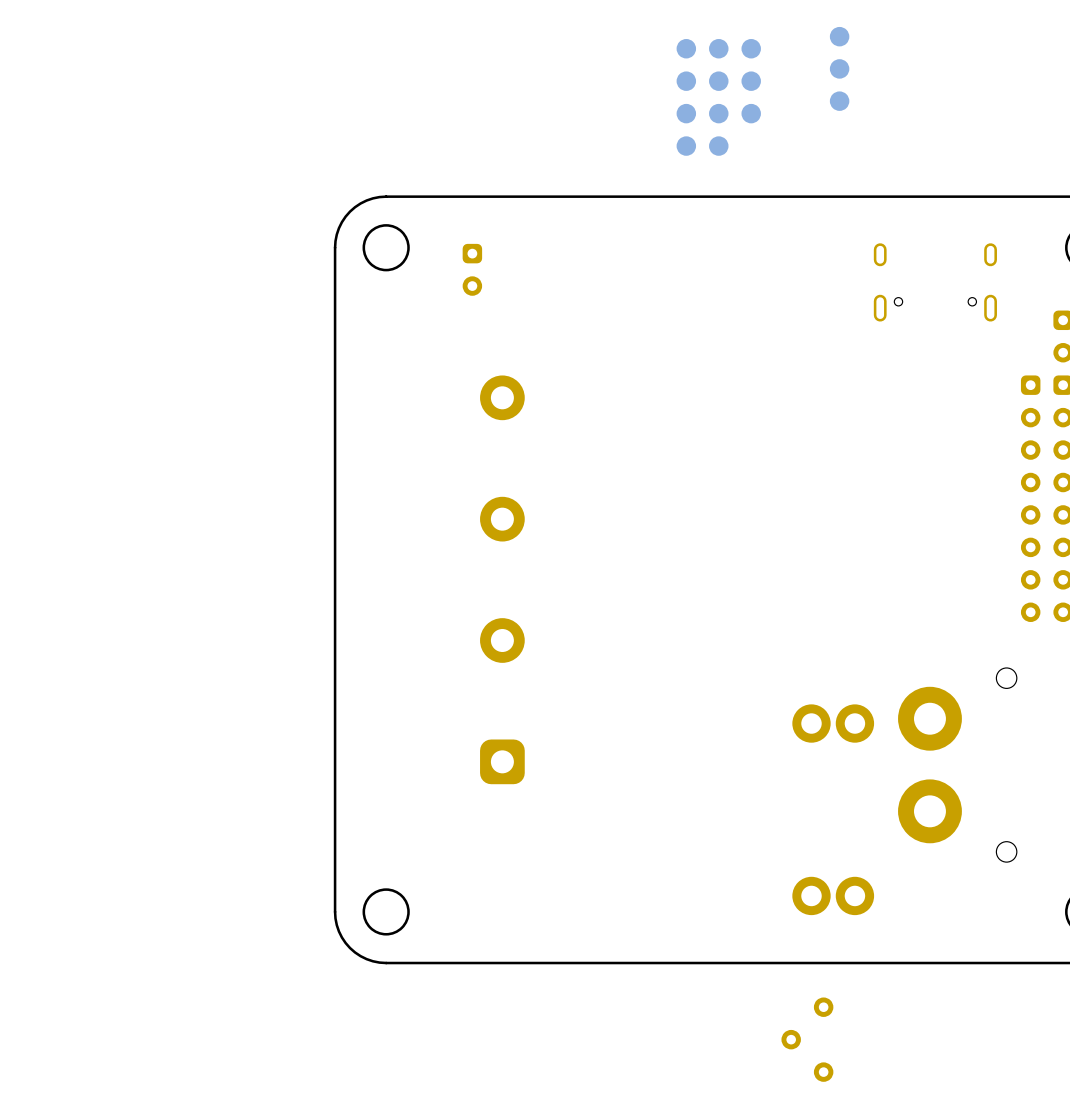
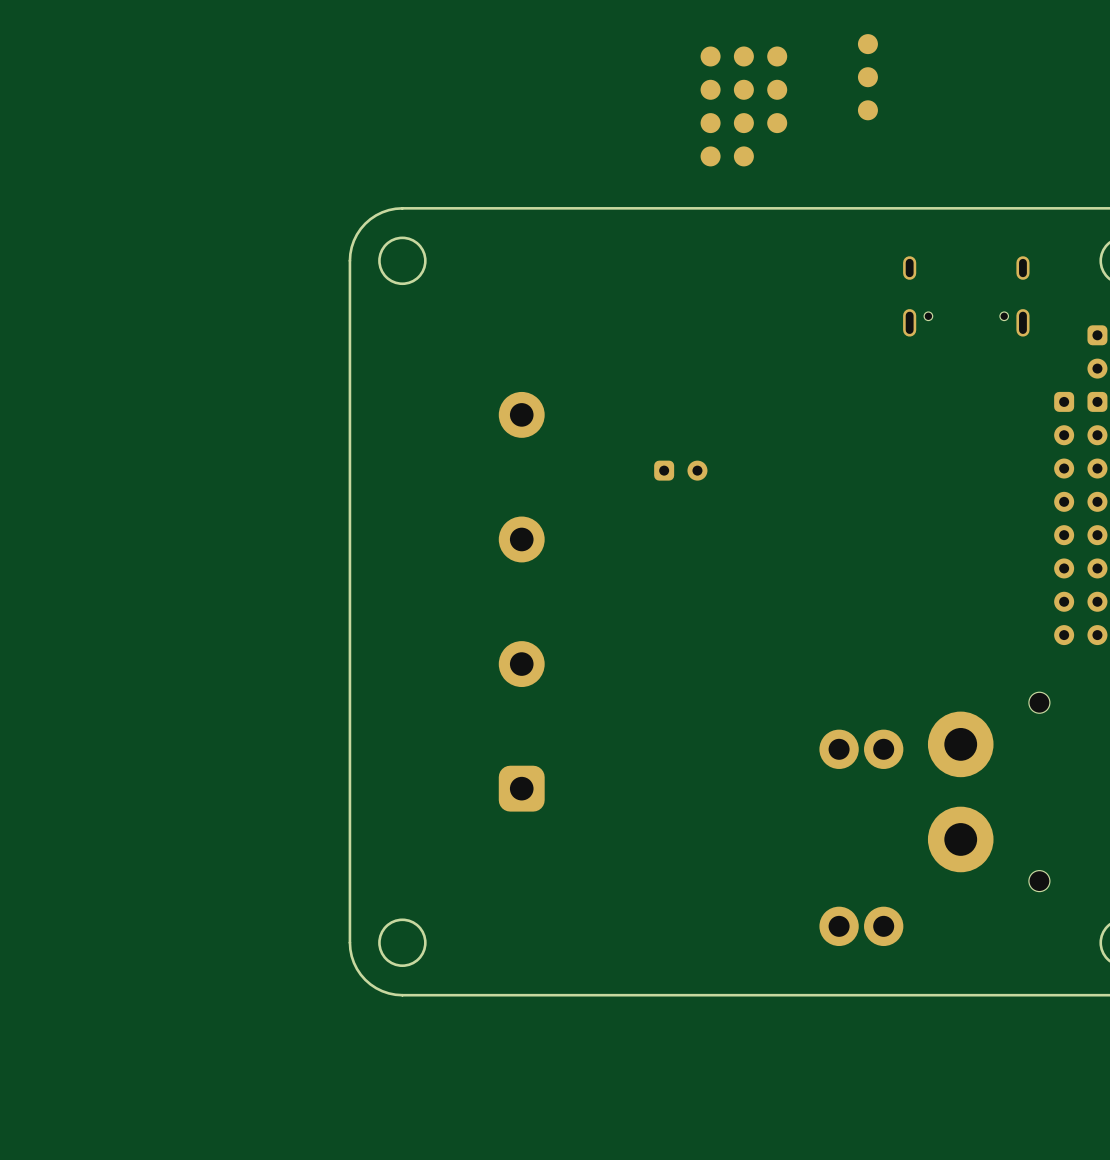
part rotation: 0° (472, 269) -> 90° counterclockwise (680, 470)
part position: (472, 269) -> (680, 470)
part: (807, 1039) -> none

